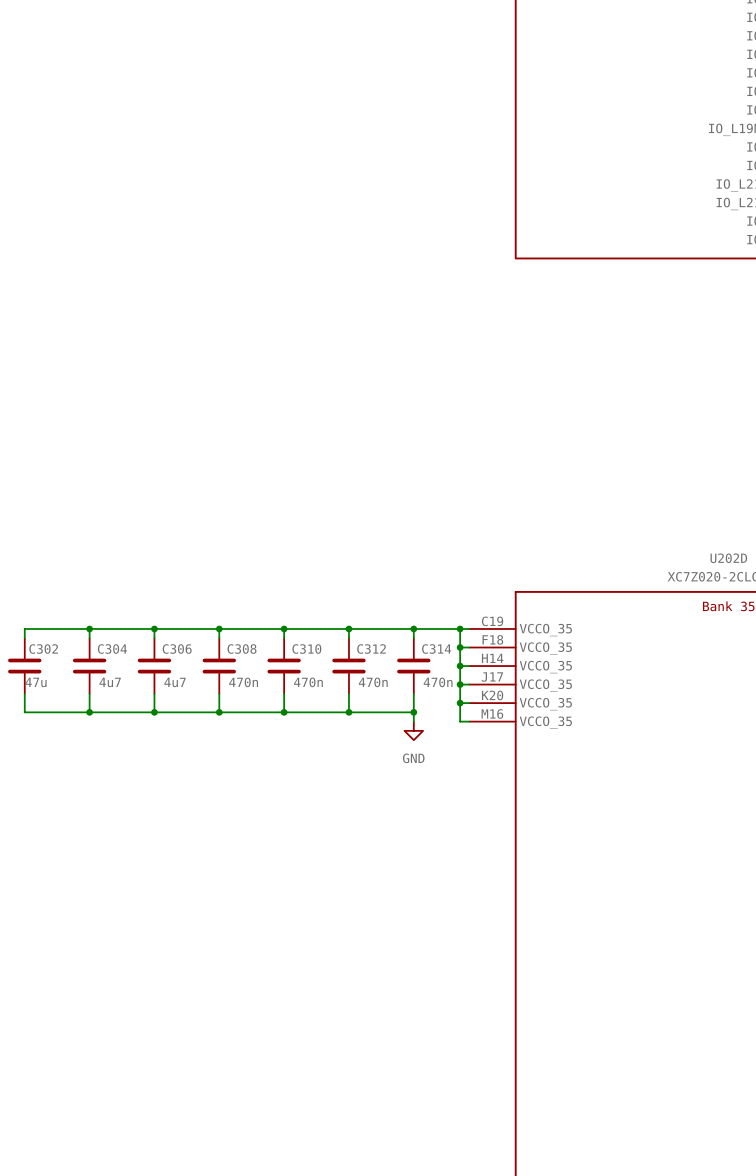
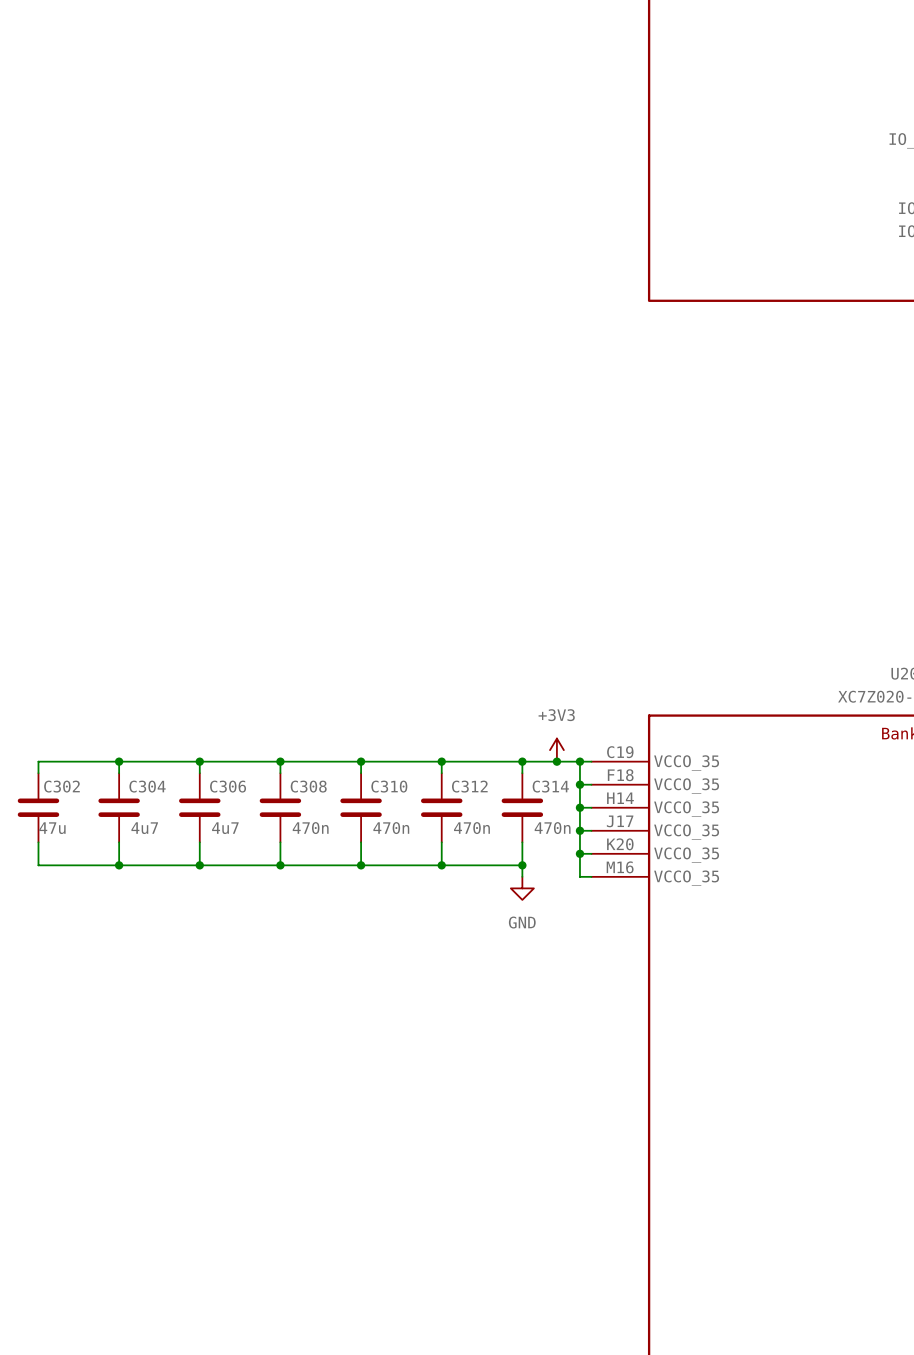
power symbol: none -> +3V3 (556, 750)
junction: none -> (556, 761)

